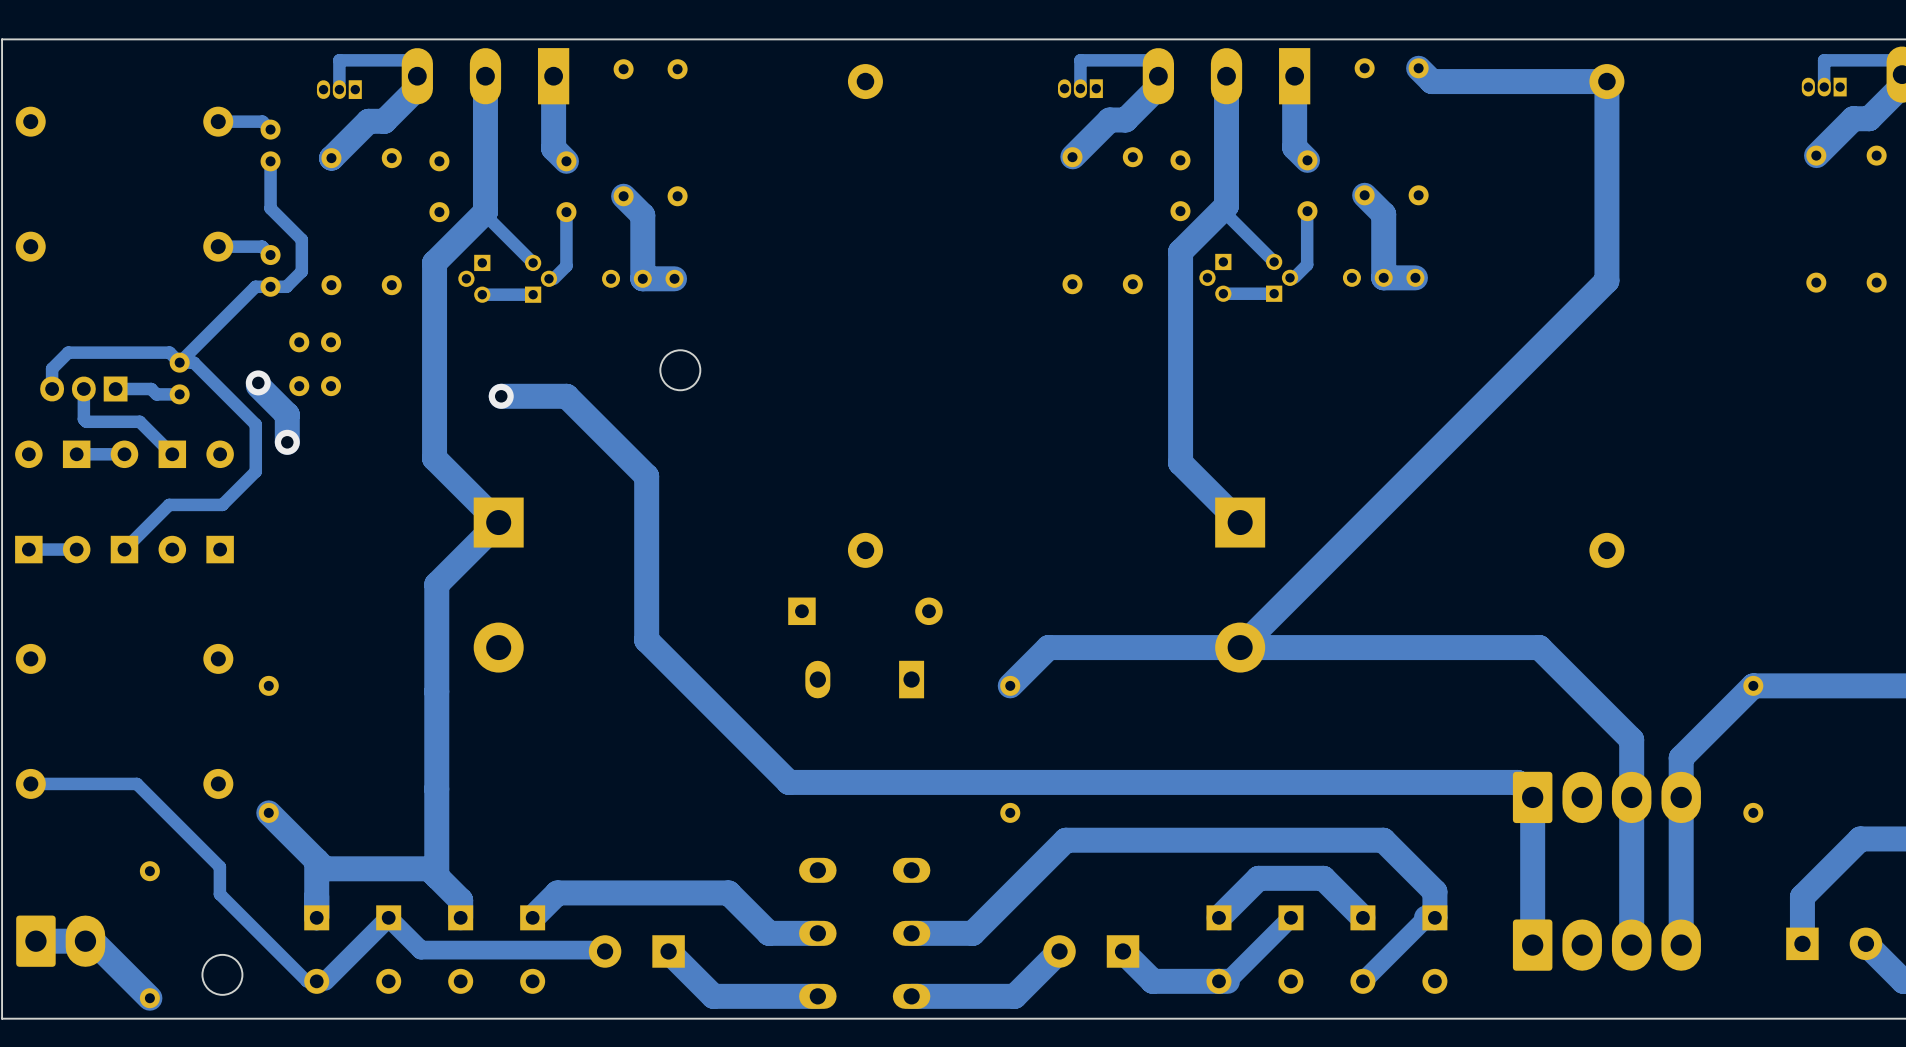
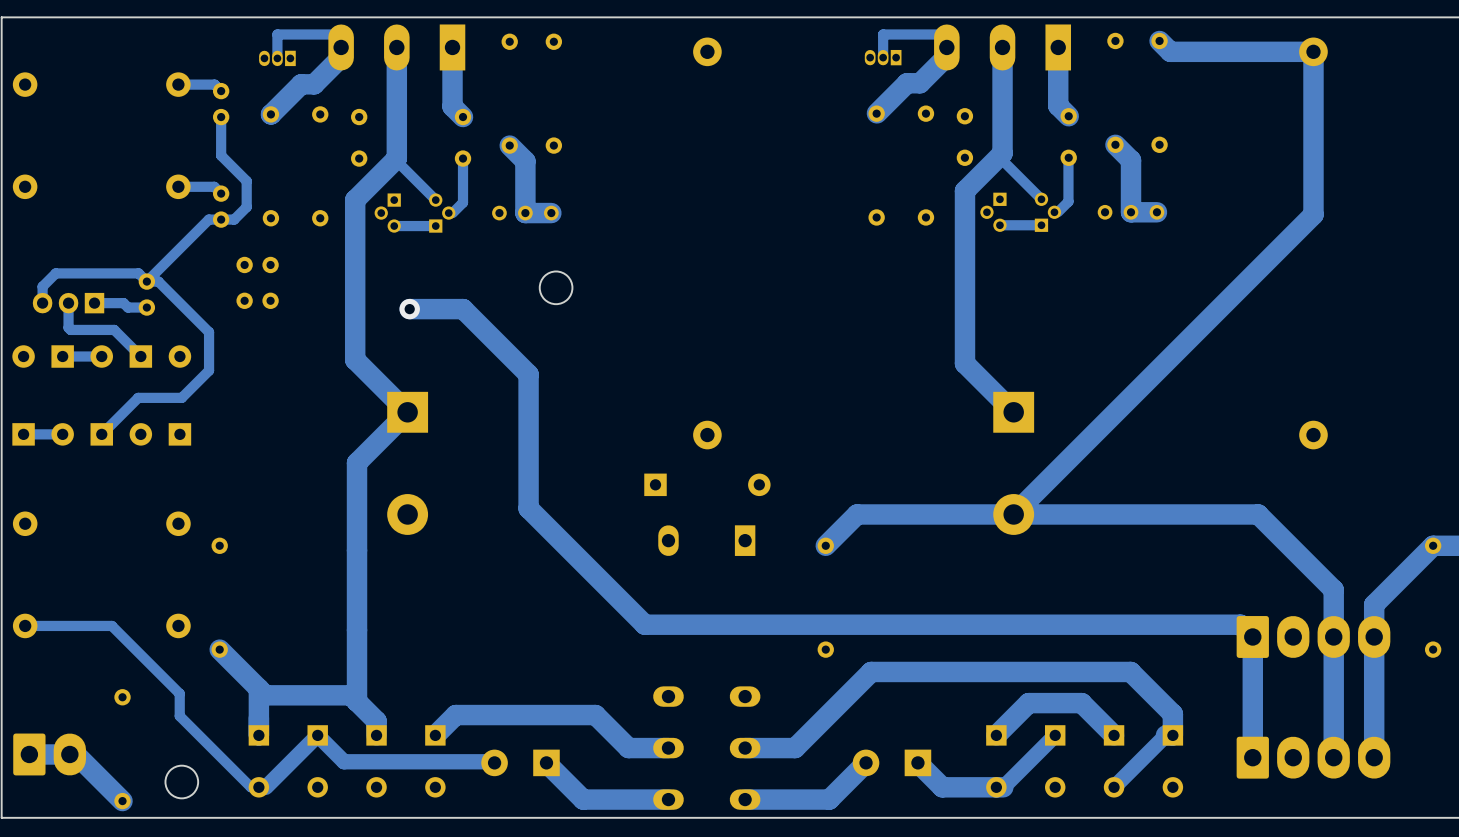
track: (258, 382) (258, 385) (287, 414) (287, 442) -> none
via: (258, 382) -> none
via: (287, 442) -> none

